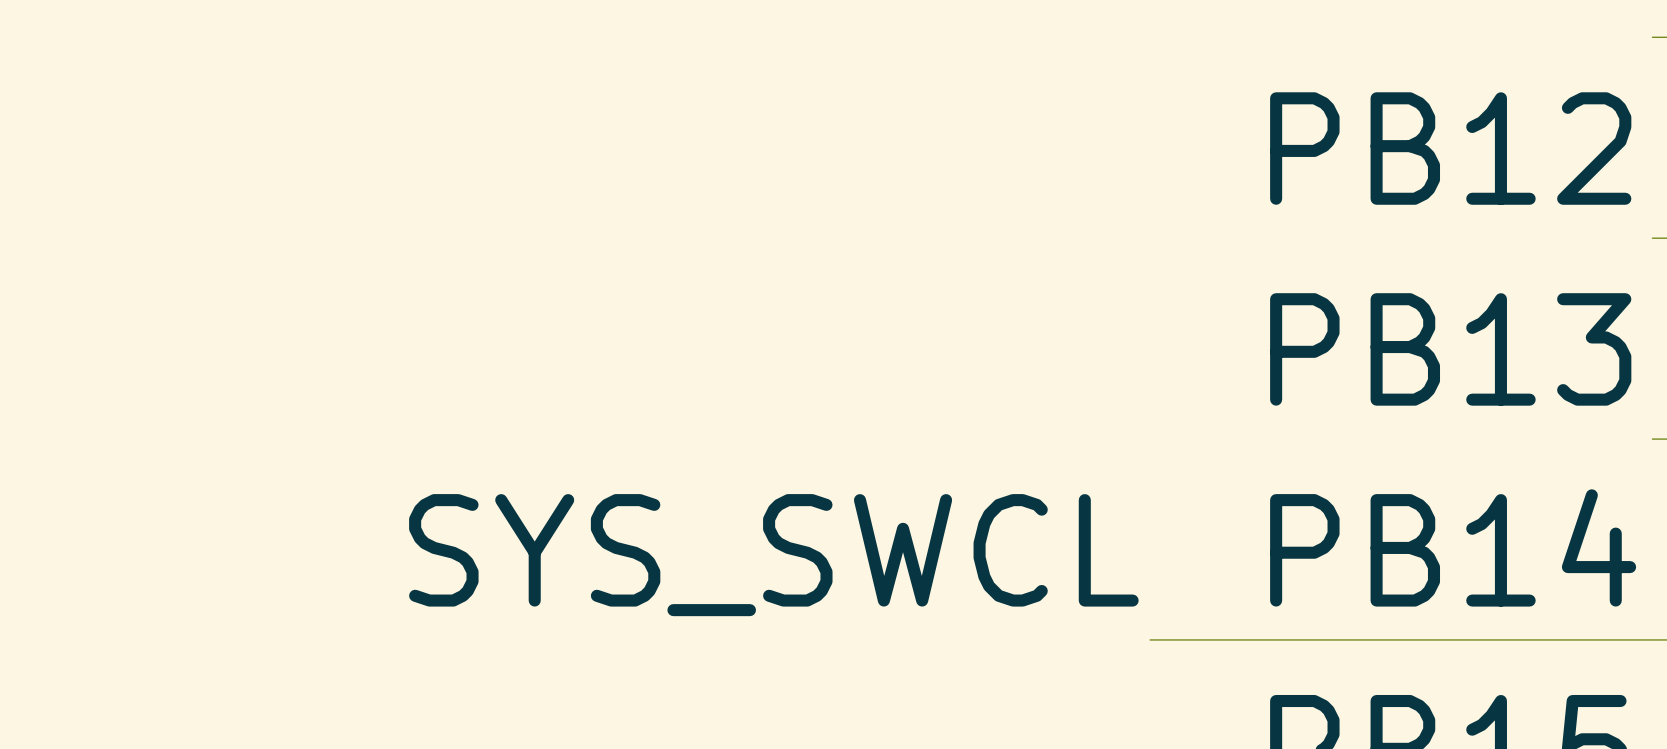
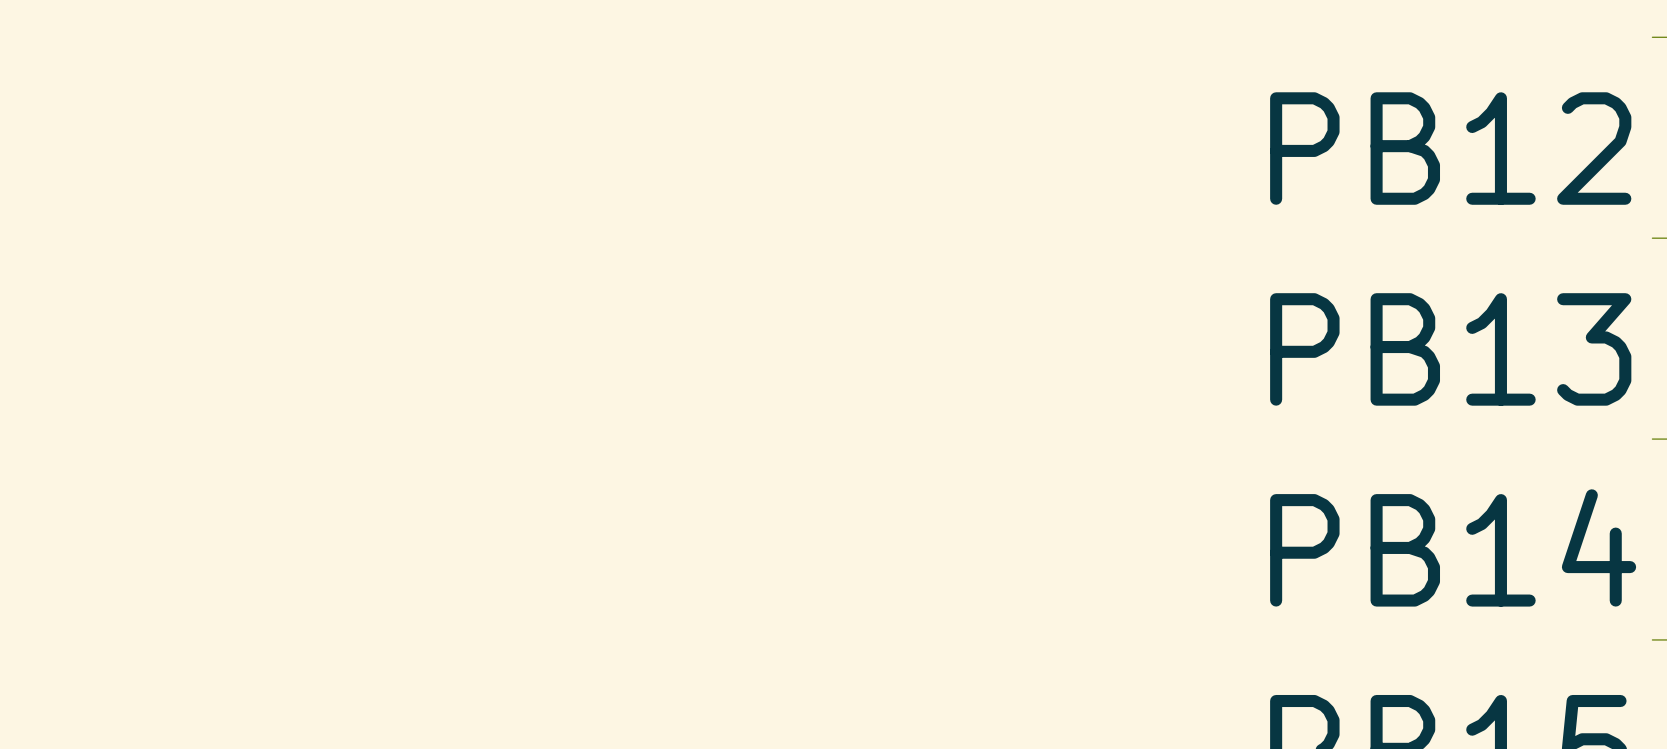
label: SYS_SWCL (773, 555) -> none
wire: (1150, 639) (1652, 639) -> none

